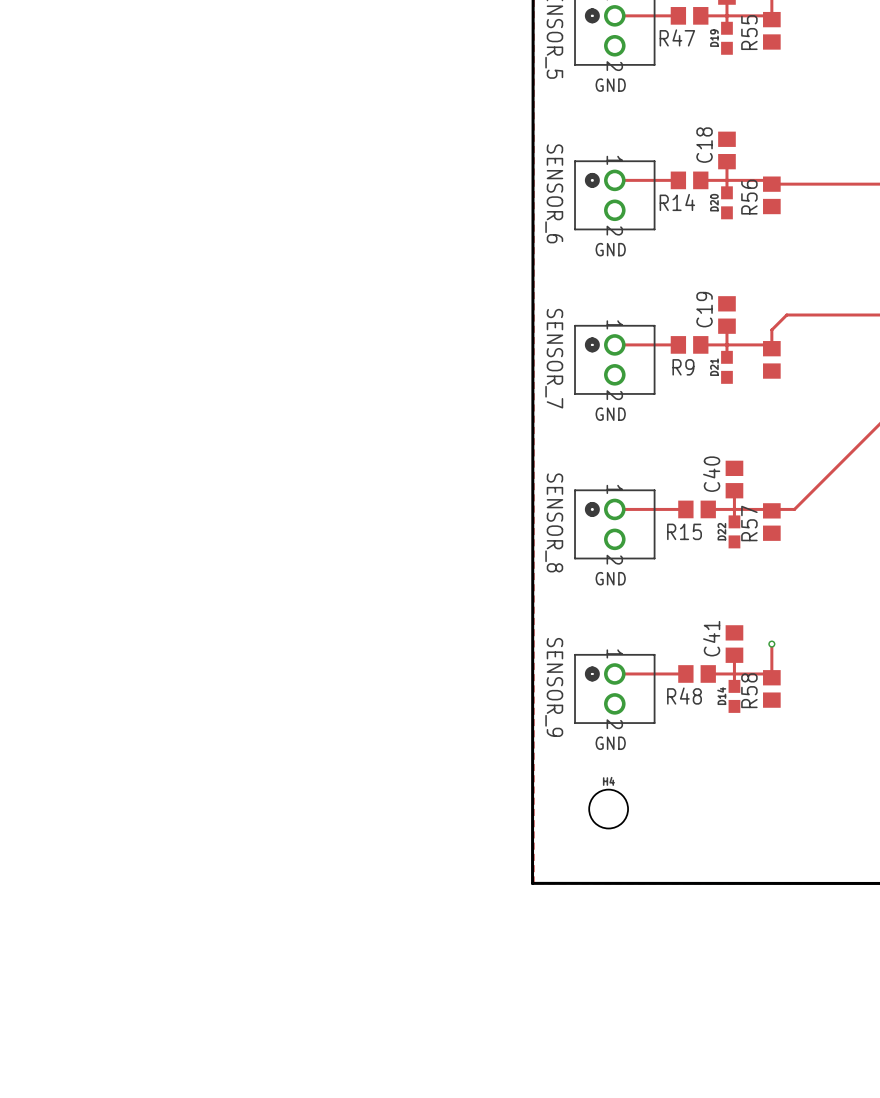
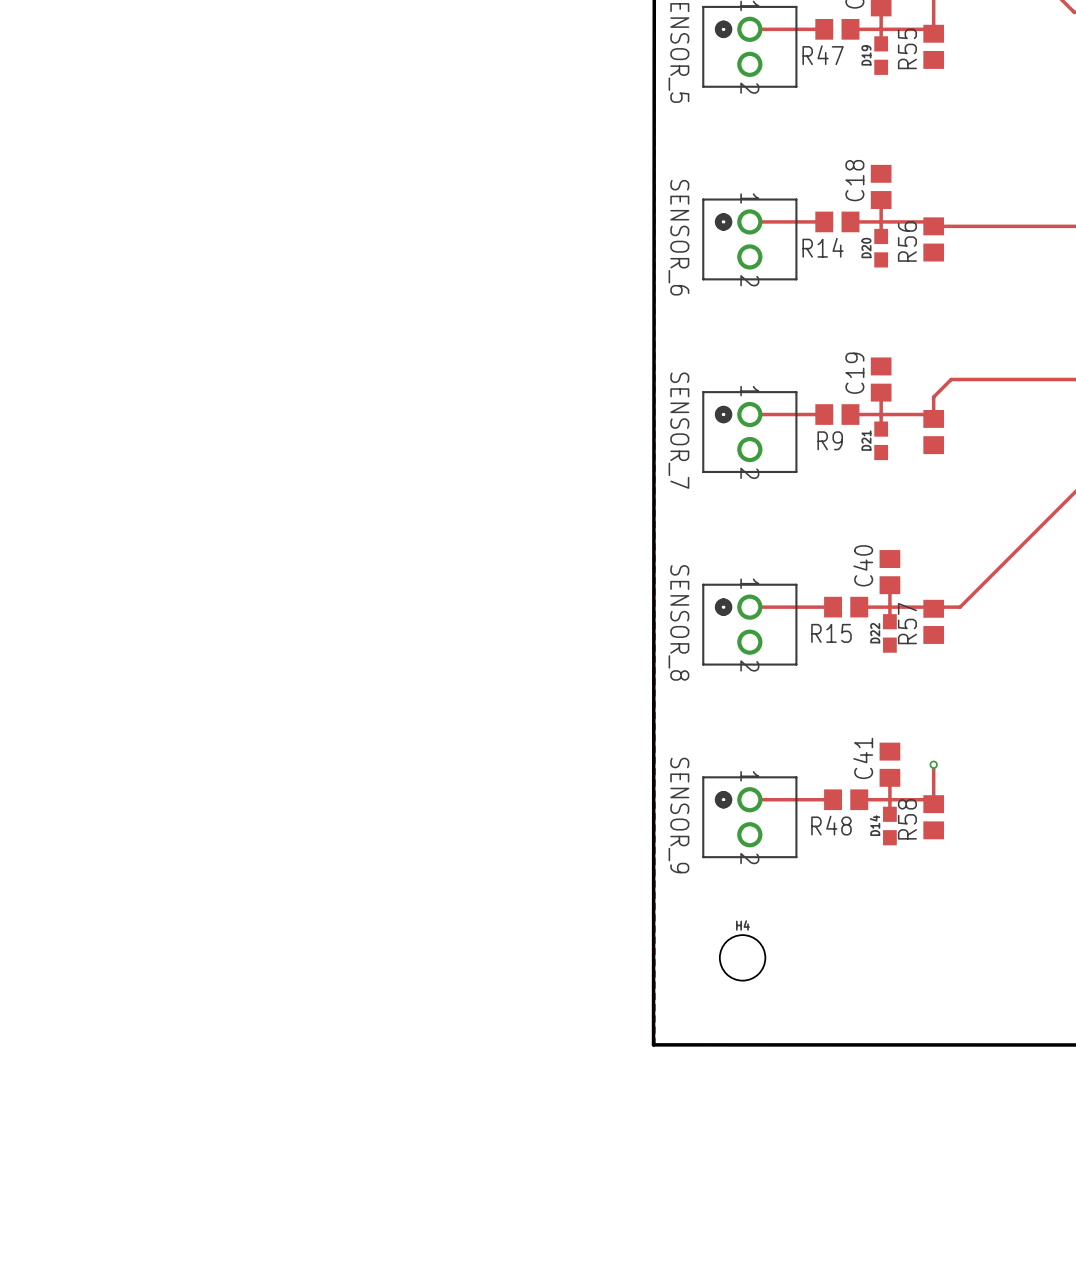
text: GND (610, 85) -> none
text: GND (610, 249) -> none
text: GND (610, 414) -> none
text: GND (610, 578) -> none
text: GND (610, 743) -> none

